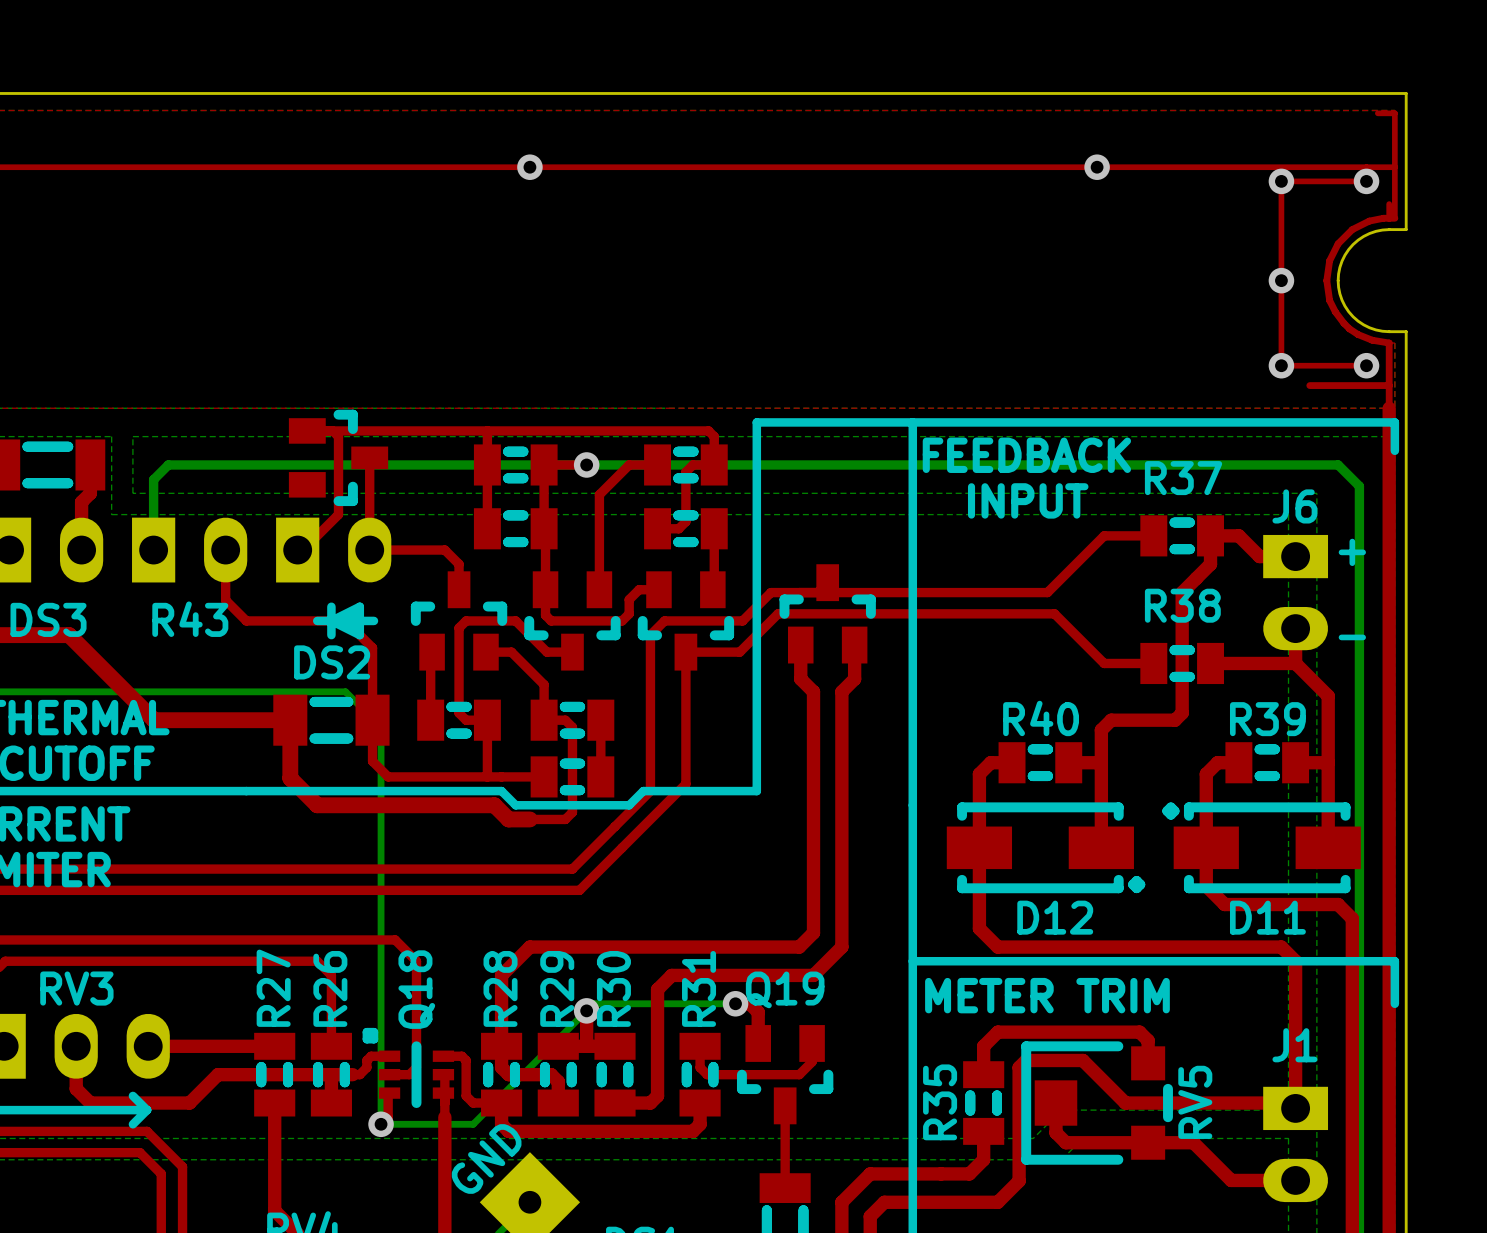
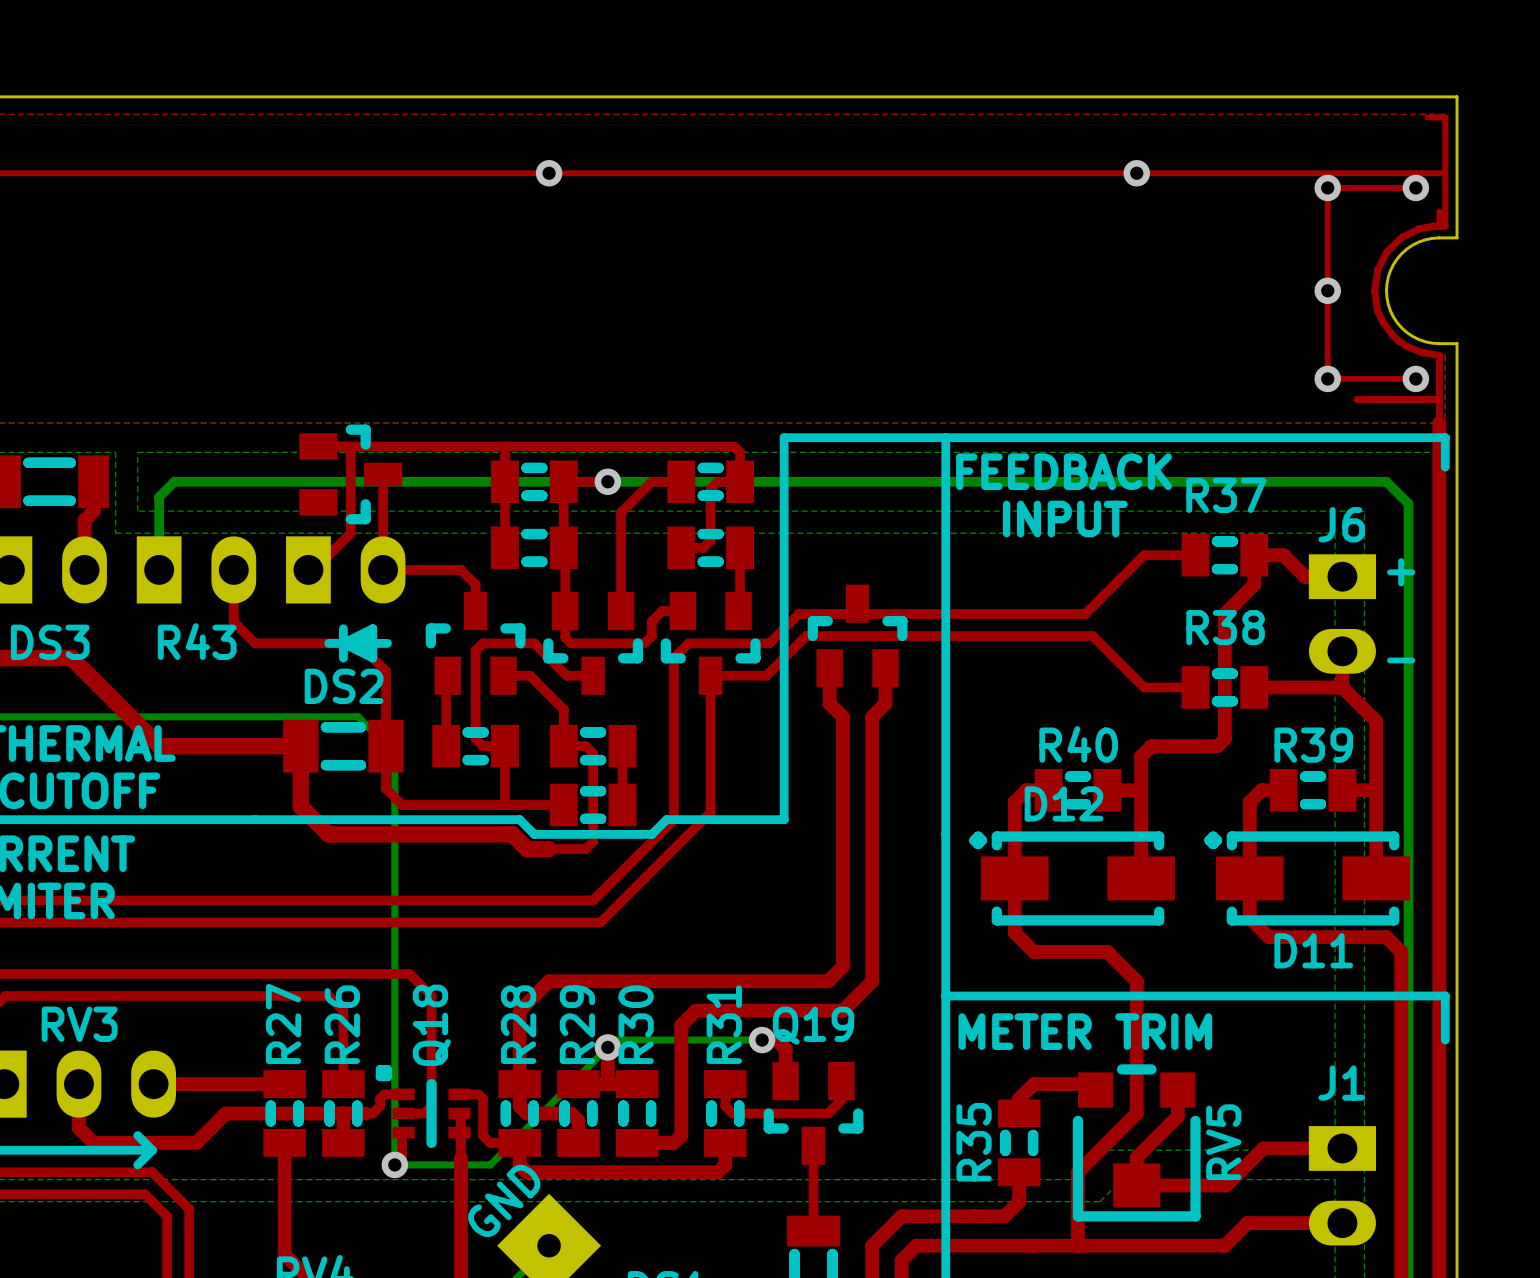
D12 rotation: 0° (1046, 847) -> 180° (1072, 878)
top track: (979, 900) (979, 928) (997, 947) (1281, 947) (1295, 961) (1295, 1108) -> (1177, 1090) (1177, 1116) (1136, 1157) (1136, 1185) (1226, 1185) (1263, 1148) (1342, 1148)
top track: none -> (1014, 932) (1033, 951) (1107, 951) (1136, 981) (1136, 1113) (1077, 1172) (1077, 1245)
top track: (983, 1060) (983, 1046) (997, 1032) (1139, 1032) (1148, 1040) (1148, 1063) -> (1019, 1098) (1033, 1084) (1089, 1084) (1095, 1090)
top track: (1055, 1103) (1055, 1132) (1065, 1142) (1193, 1142) (1231, 1180) -> none
RV5 rotation: 0° (1097, 1103) -> 90° counterclockwise (1136, 1142)
top track: (1290, 1103) (1125, 1103) (1082, 1060) (1026, 1060) (1019, 1067) (1019, 1181) (997, 1202) -> (1275, 1223) (1247, 1223) (1224, 1245) (1033, 1245)

